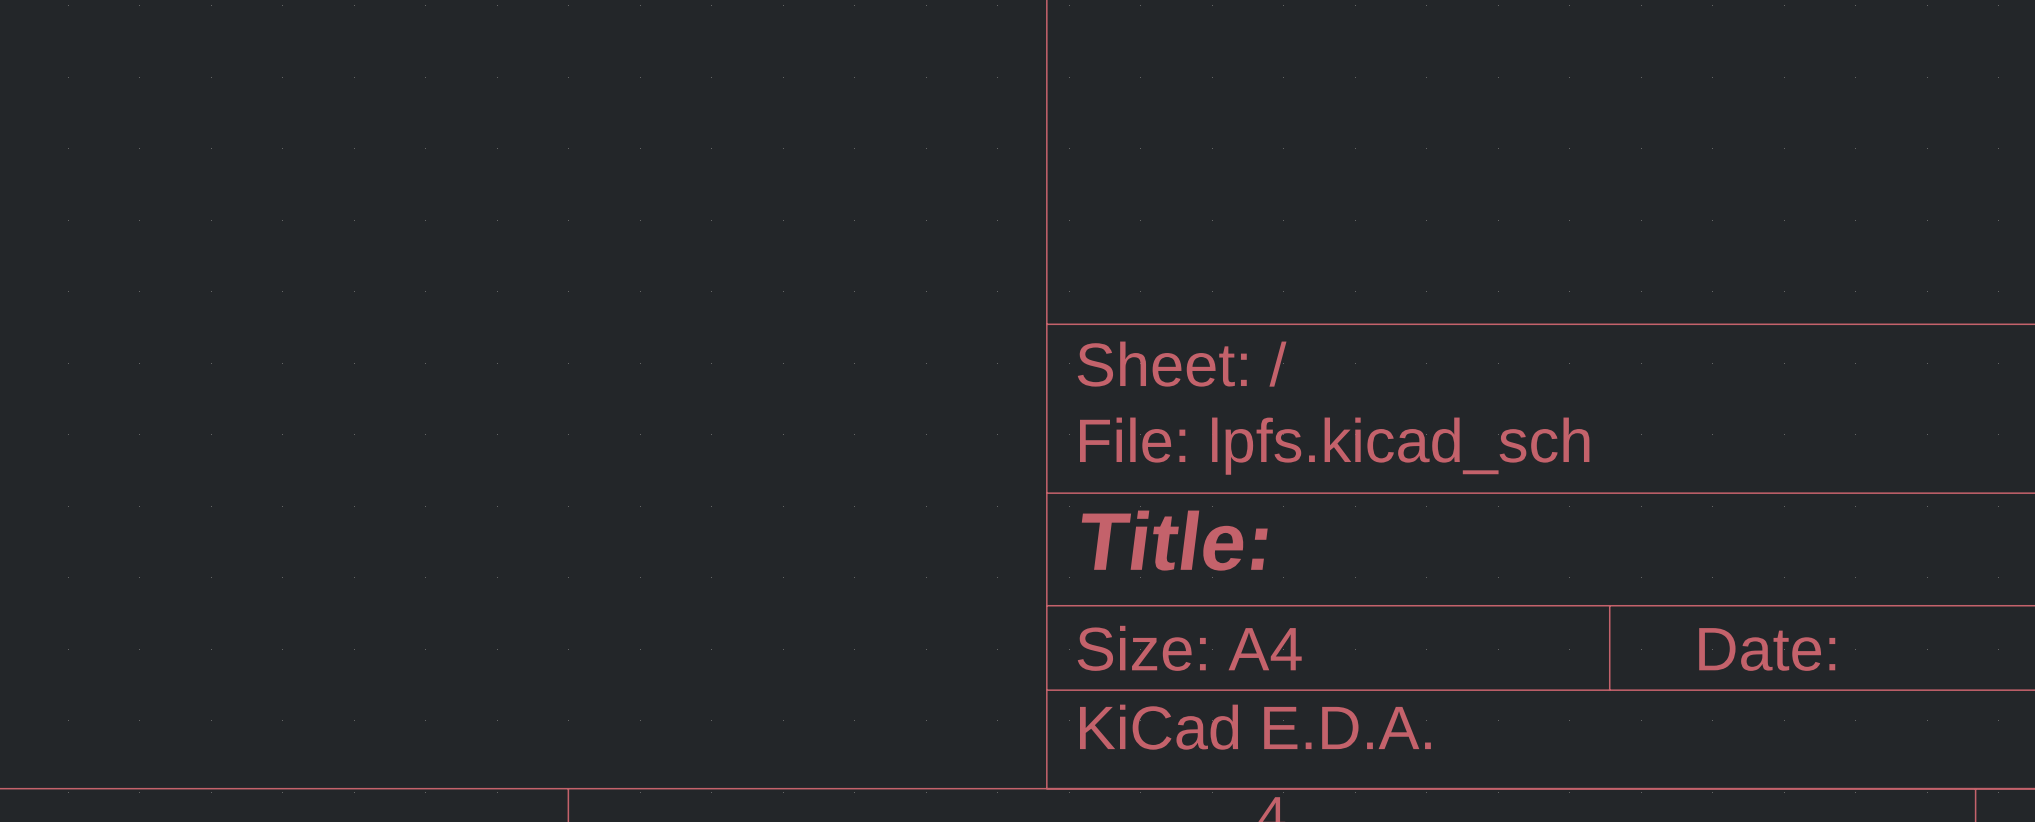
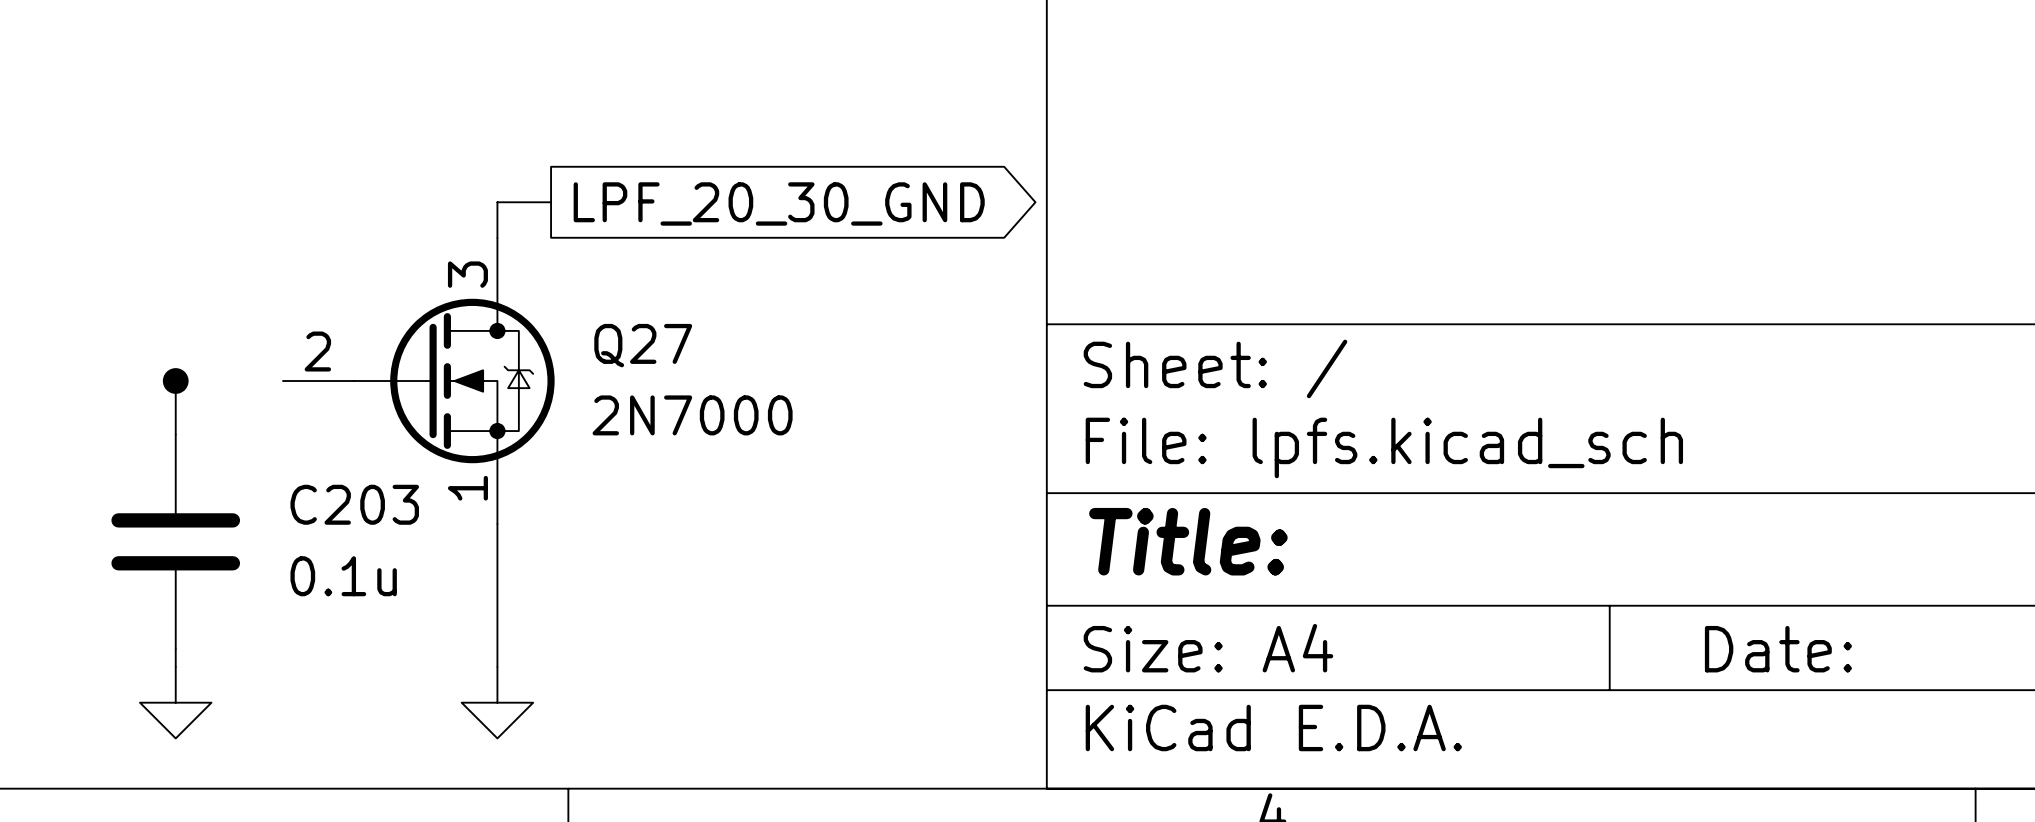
wire: none -> (551, 202) (497, 202) (497, 238)
global label: none -> LPF_20_30_GND (779, 203)
wire: none -> (175, 381) (175, 434)
junction: none -> (175, 381)
Q27: none -> 2N7000 (418, 381)
wire: none -> (497, 523) (497, 666)
C203: none -> 0.1u (175, 541)
wire: none -> (175, 649) (175, 666)
power symbol: none -> (175, 702)
power symbol: none -> (497, 702)

